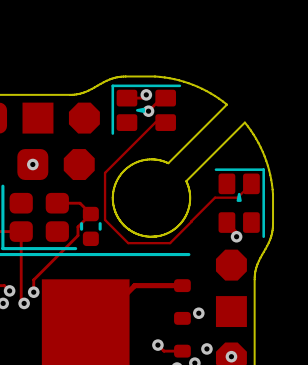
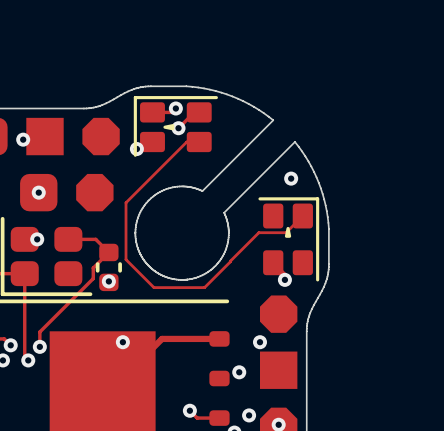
via: none -> (23, 139)
via: none -> (136, 149)
via: none -> (291, 178)
via: none -> (37, 239)
via: none -> (108, 281)
via: none -> (122, 342)
via: none -> (259, 342)

